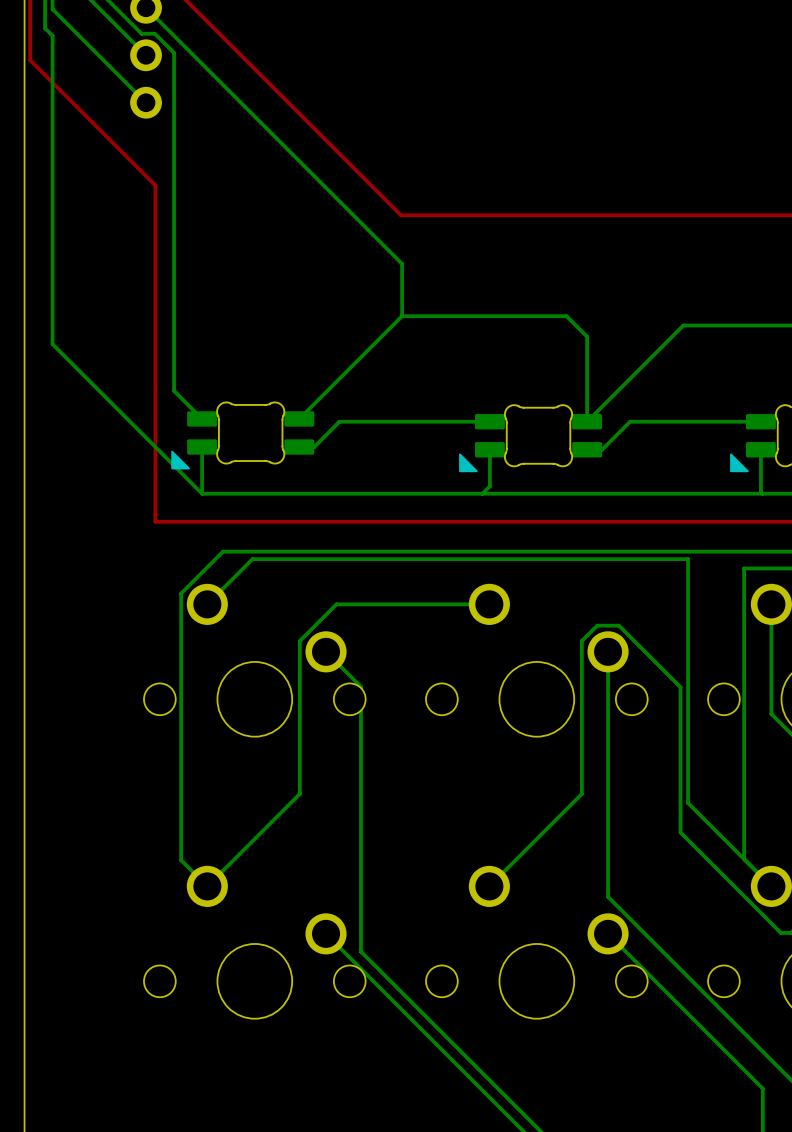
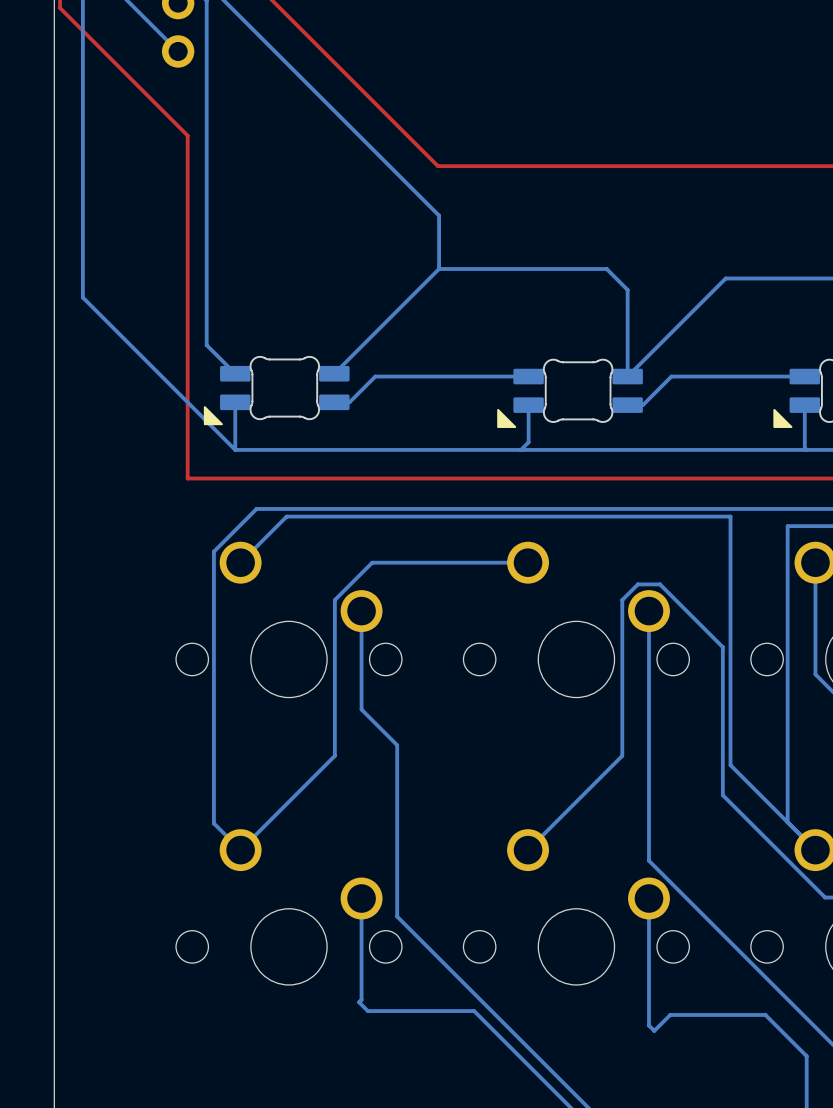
bottom track: (326, 651) (360, 686) (360, 783) -> (361, 611) (361, 709) (397, 745)
bottom track: (326, 933) (436, 1044) -> (361, 898) (361, 999) (359, 1002) (367, 1011) (474, 1011)
bottom track: (608, 933) (722, 1048) -> (648, 898) (648, 1025) (654, 1030) (670, 1014) (765, 1014)

